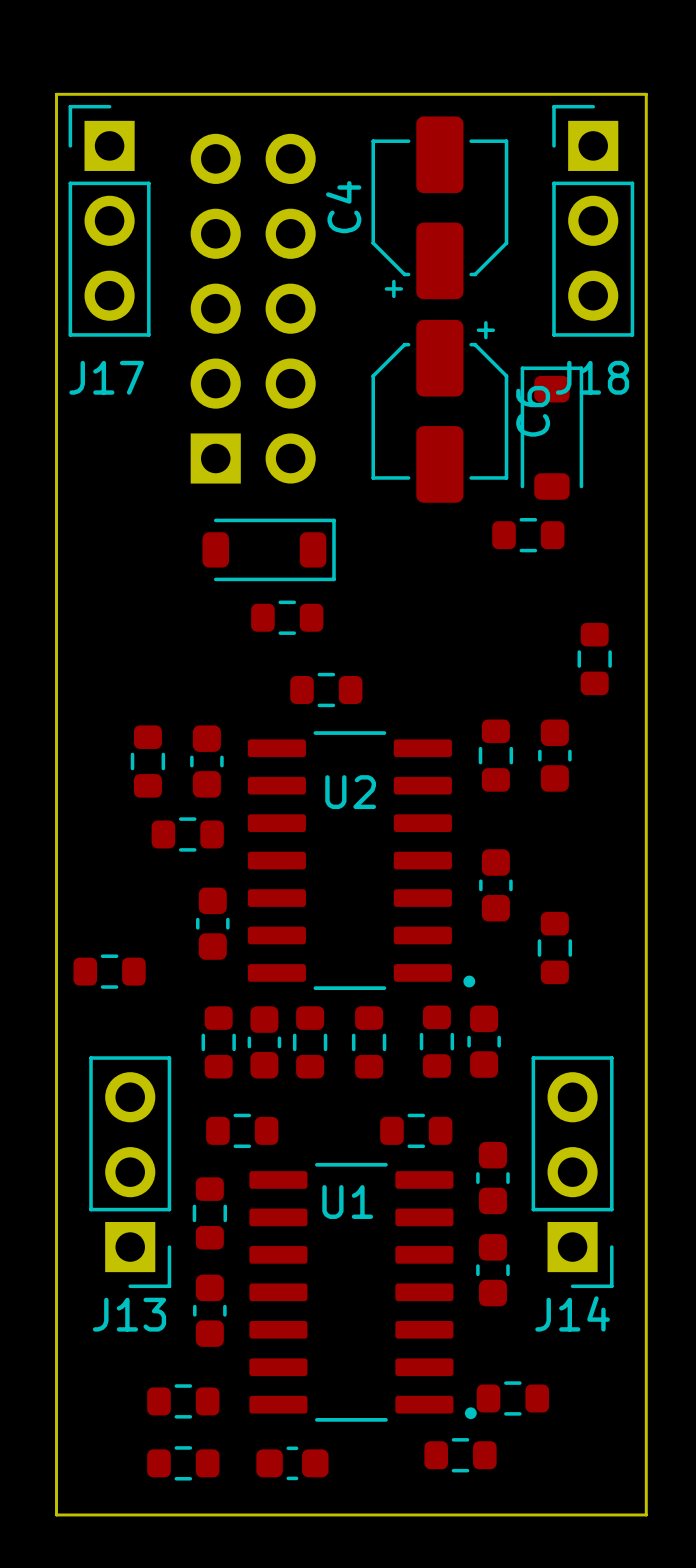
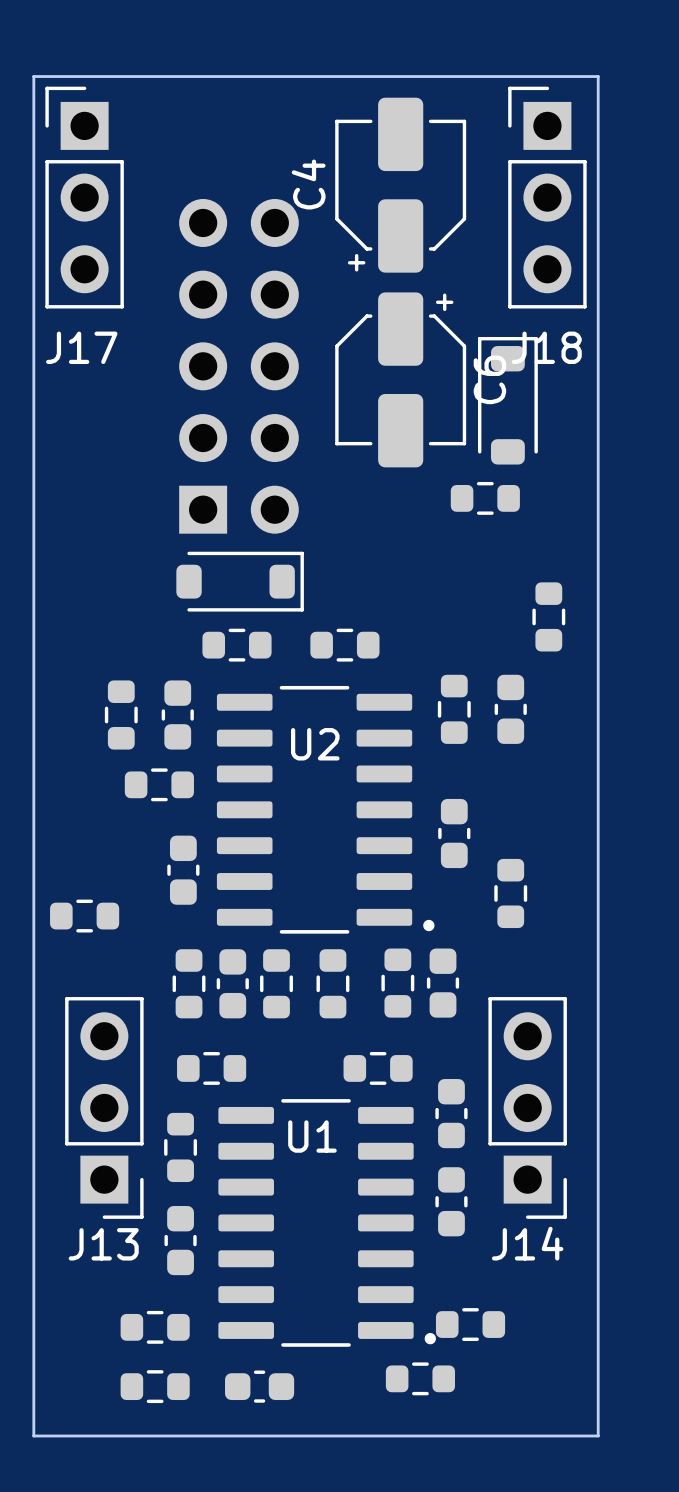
part position: (253, 308) -> (238, 366)
part: (269, 549) -> none
part footprint: [251, 600, 324, 635] -> [176, 551, 304, 612]
part: none -> (237, 645)
part: none -> (344, 645)
part: (326, 689) -> none

